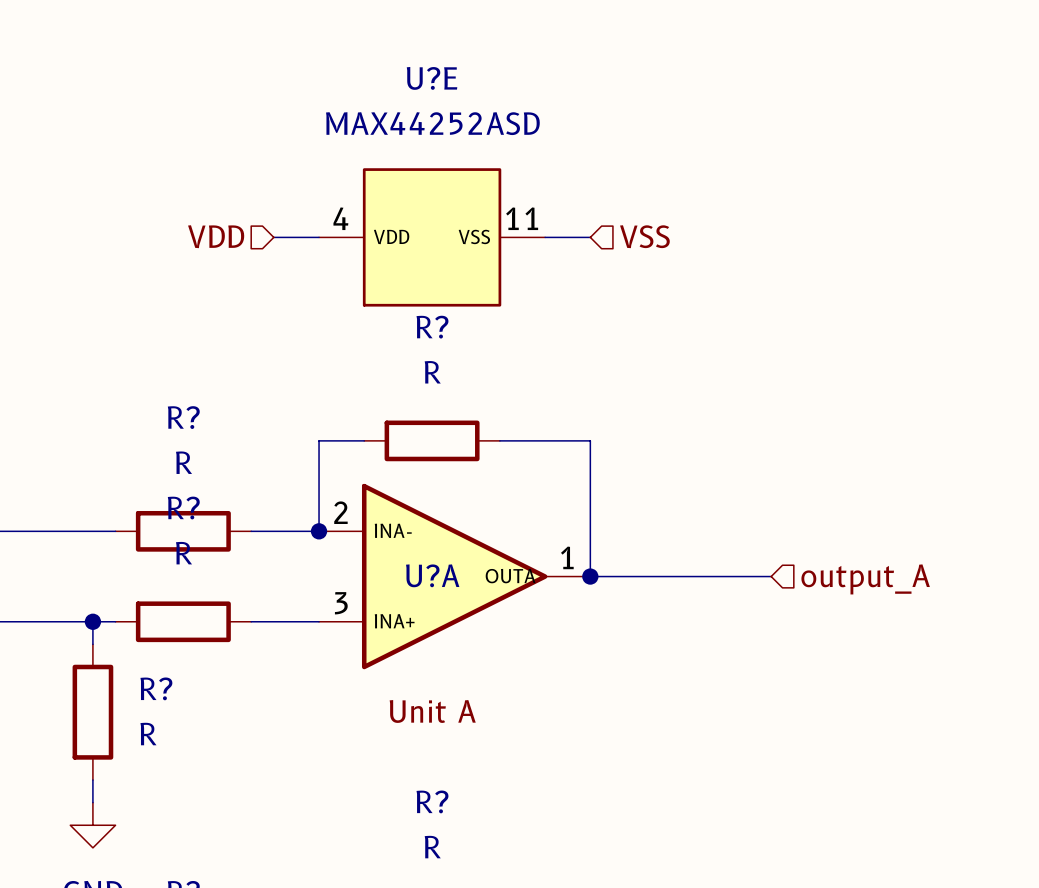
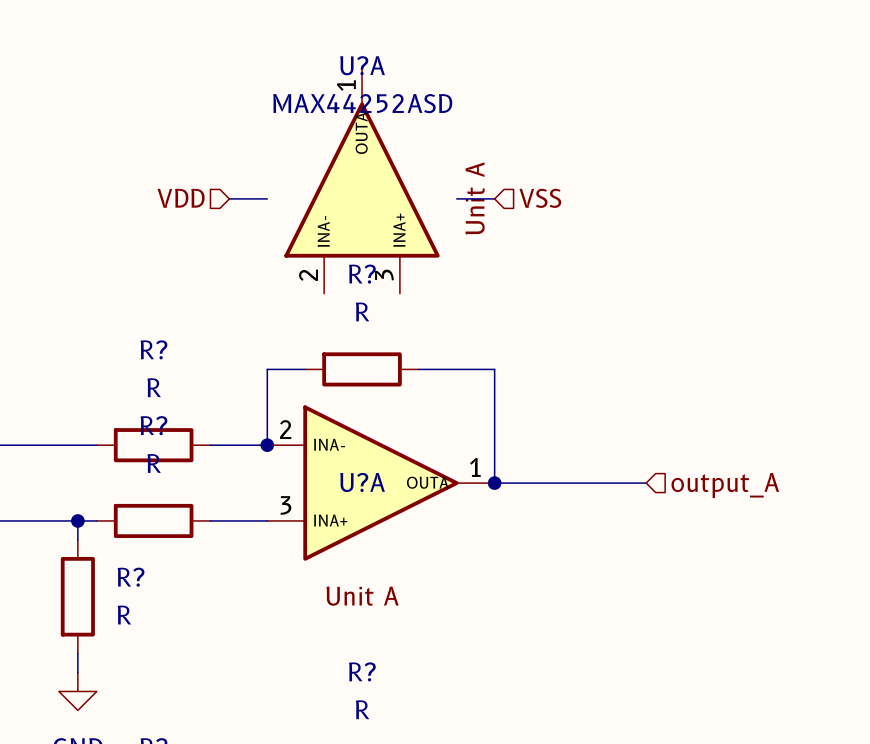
U?A: none -> MAX44252ASD (362, 179)
U?E: MAX44252ASD (432, 237) -> none

